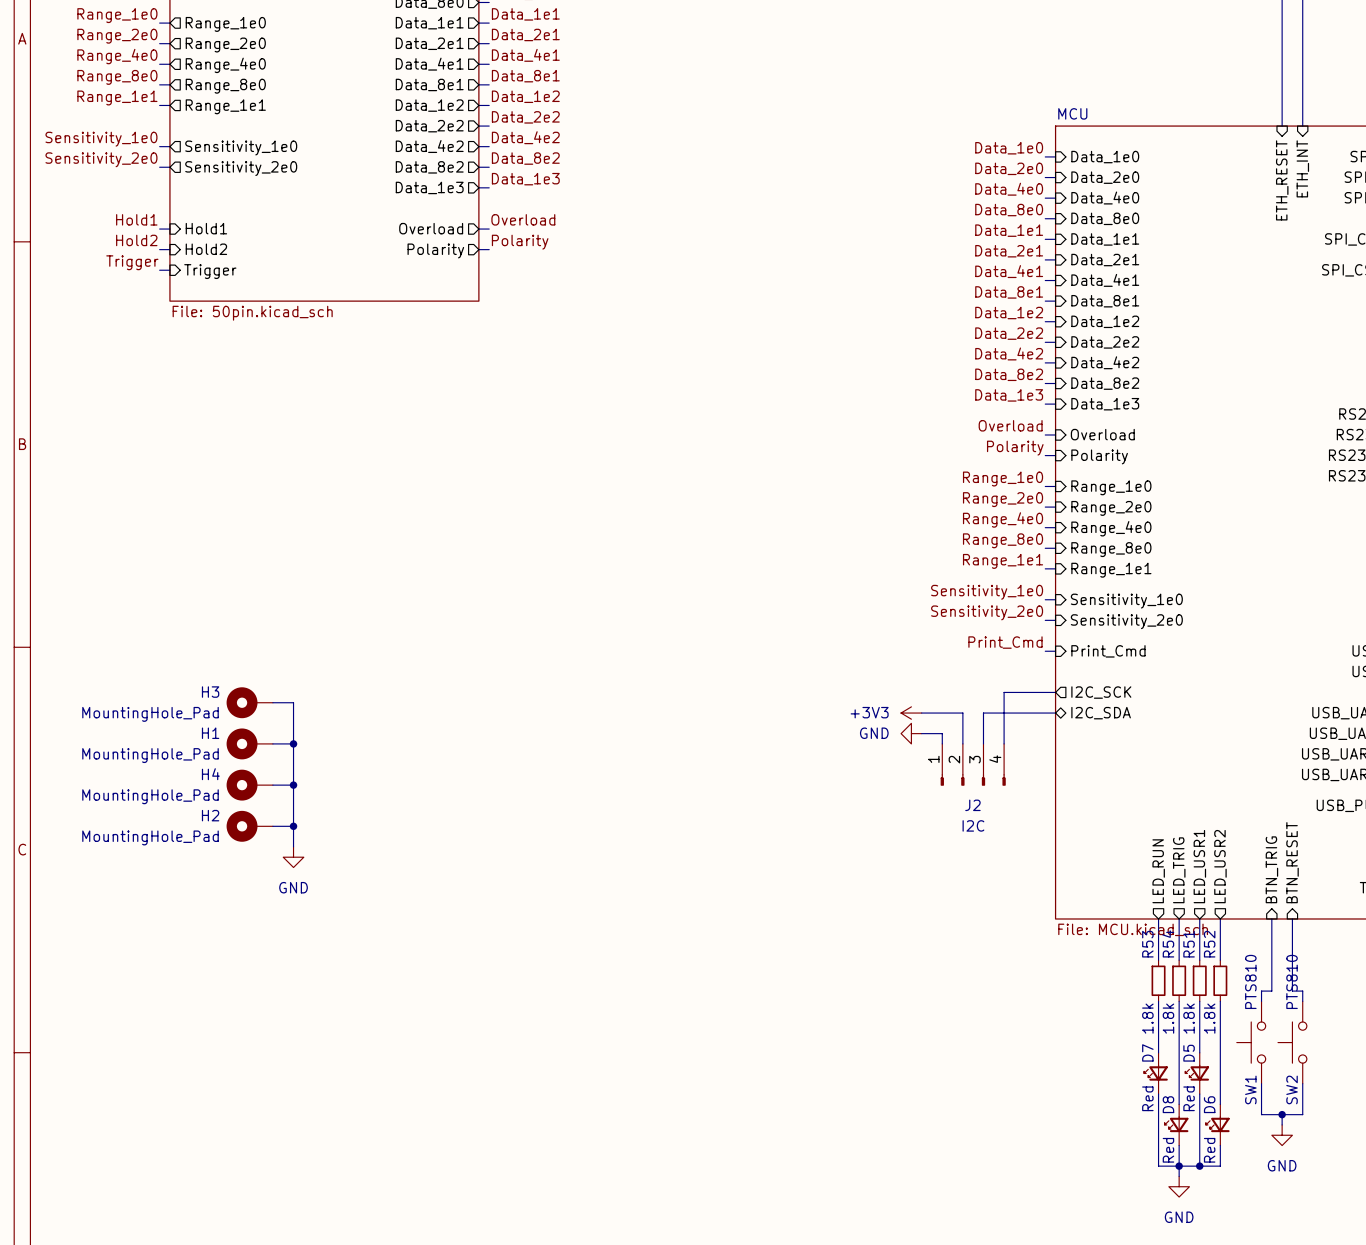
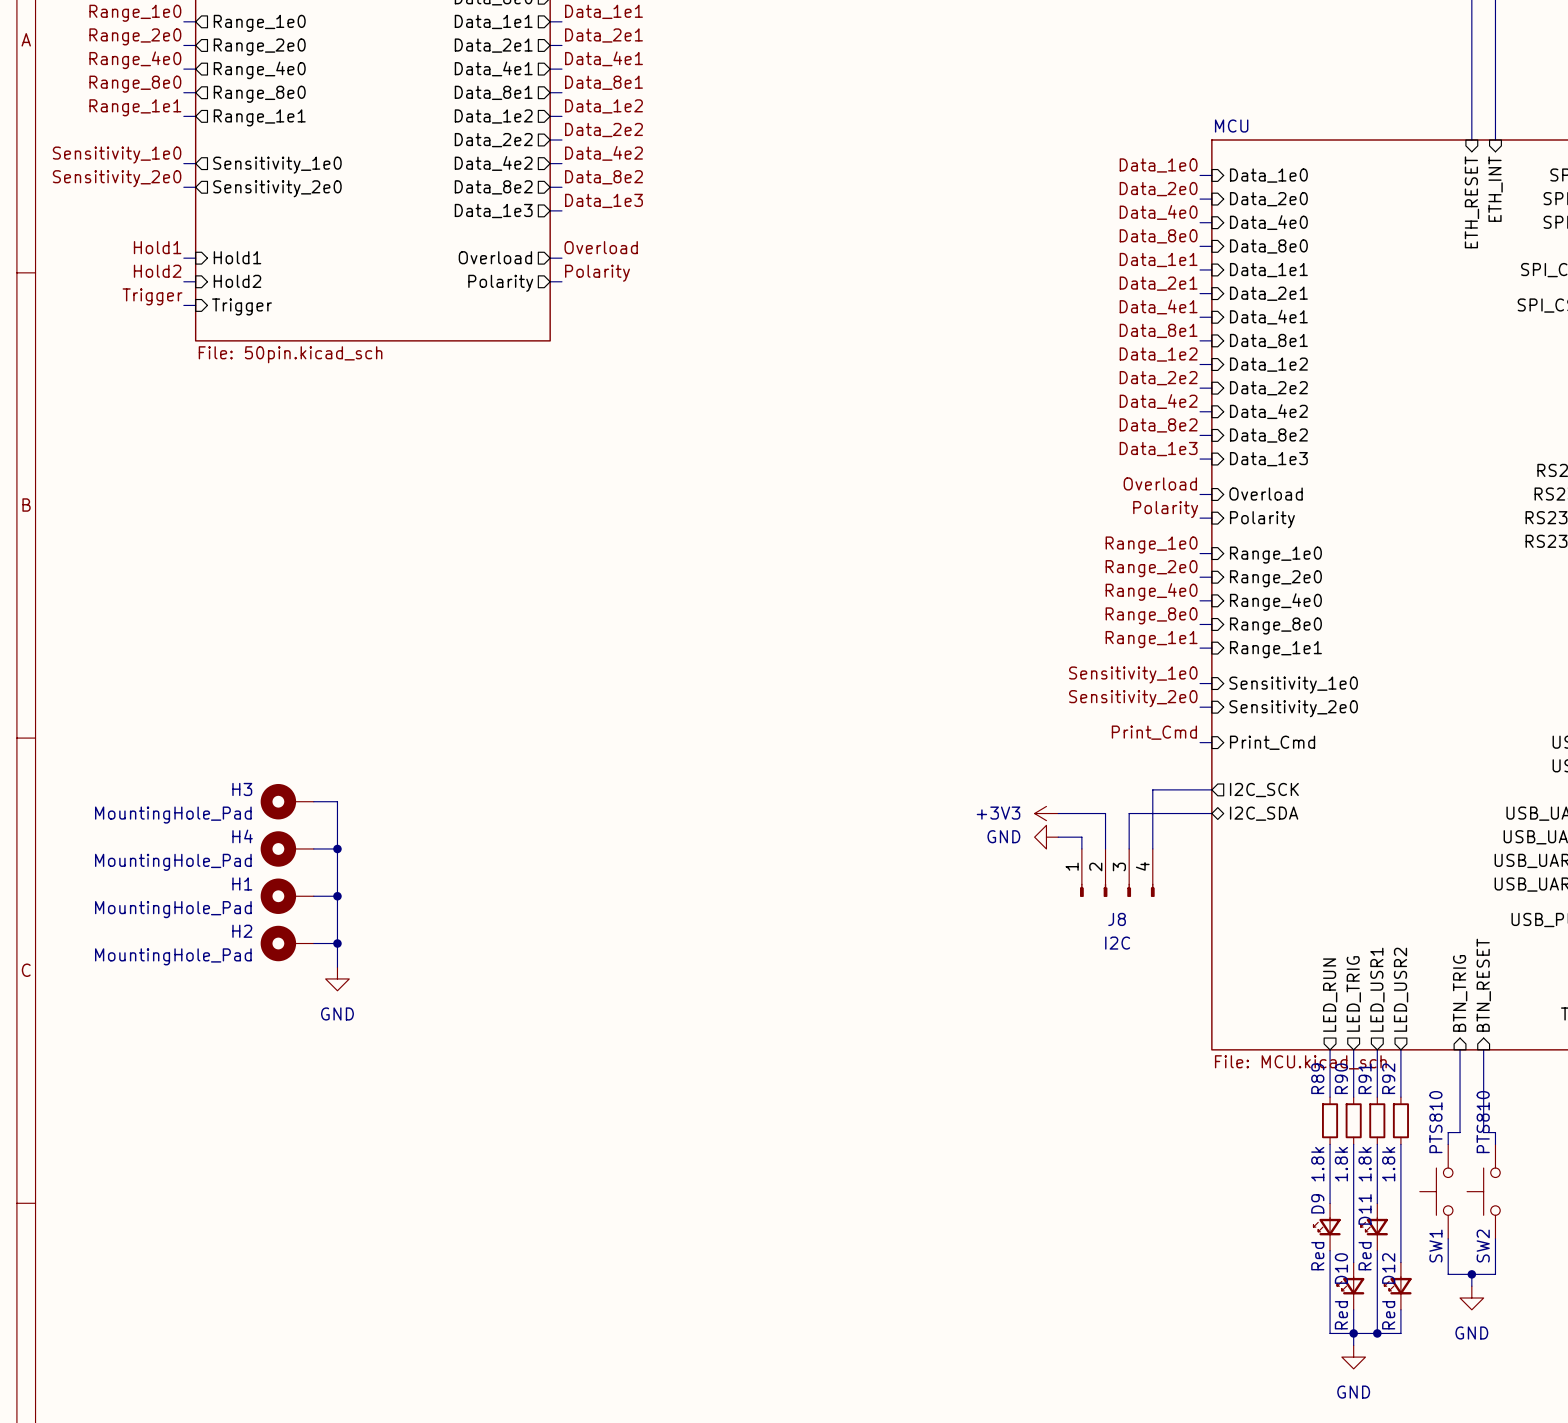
H1 name: H1 (210, 733) -> H4 (242, 836)
H4 name: H4 (210, 774) -> H1 (242, 883)
J2 name: J2 (972, 805) -> J8 (1117, 919)
R54 name: R54 (1168, 943) -> R90 (1341, 1078)
R53 name: R53 (1147, 944) -> R89 (1317, 1078)
R51 name: R51 (1189, 944) -> R91 (1365, 1078)
R52 name: R52 (1209, 944) -> R92 (1388, 1078)
D7 name: D7 (1147, 1052) -> D9 (1317, 1203)
D5 name: D5 (1189, 1053) -> D11 (1365, 1209)
D8 name: D8 (1168, 1104) -> D10 (1341, 1268)
D6 name: D6 (1209, 1104) -> D12 (1388, 1268)

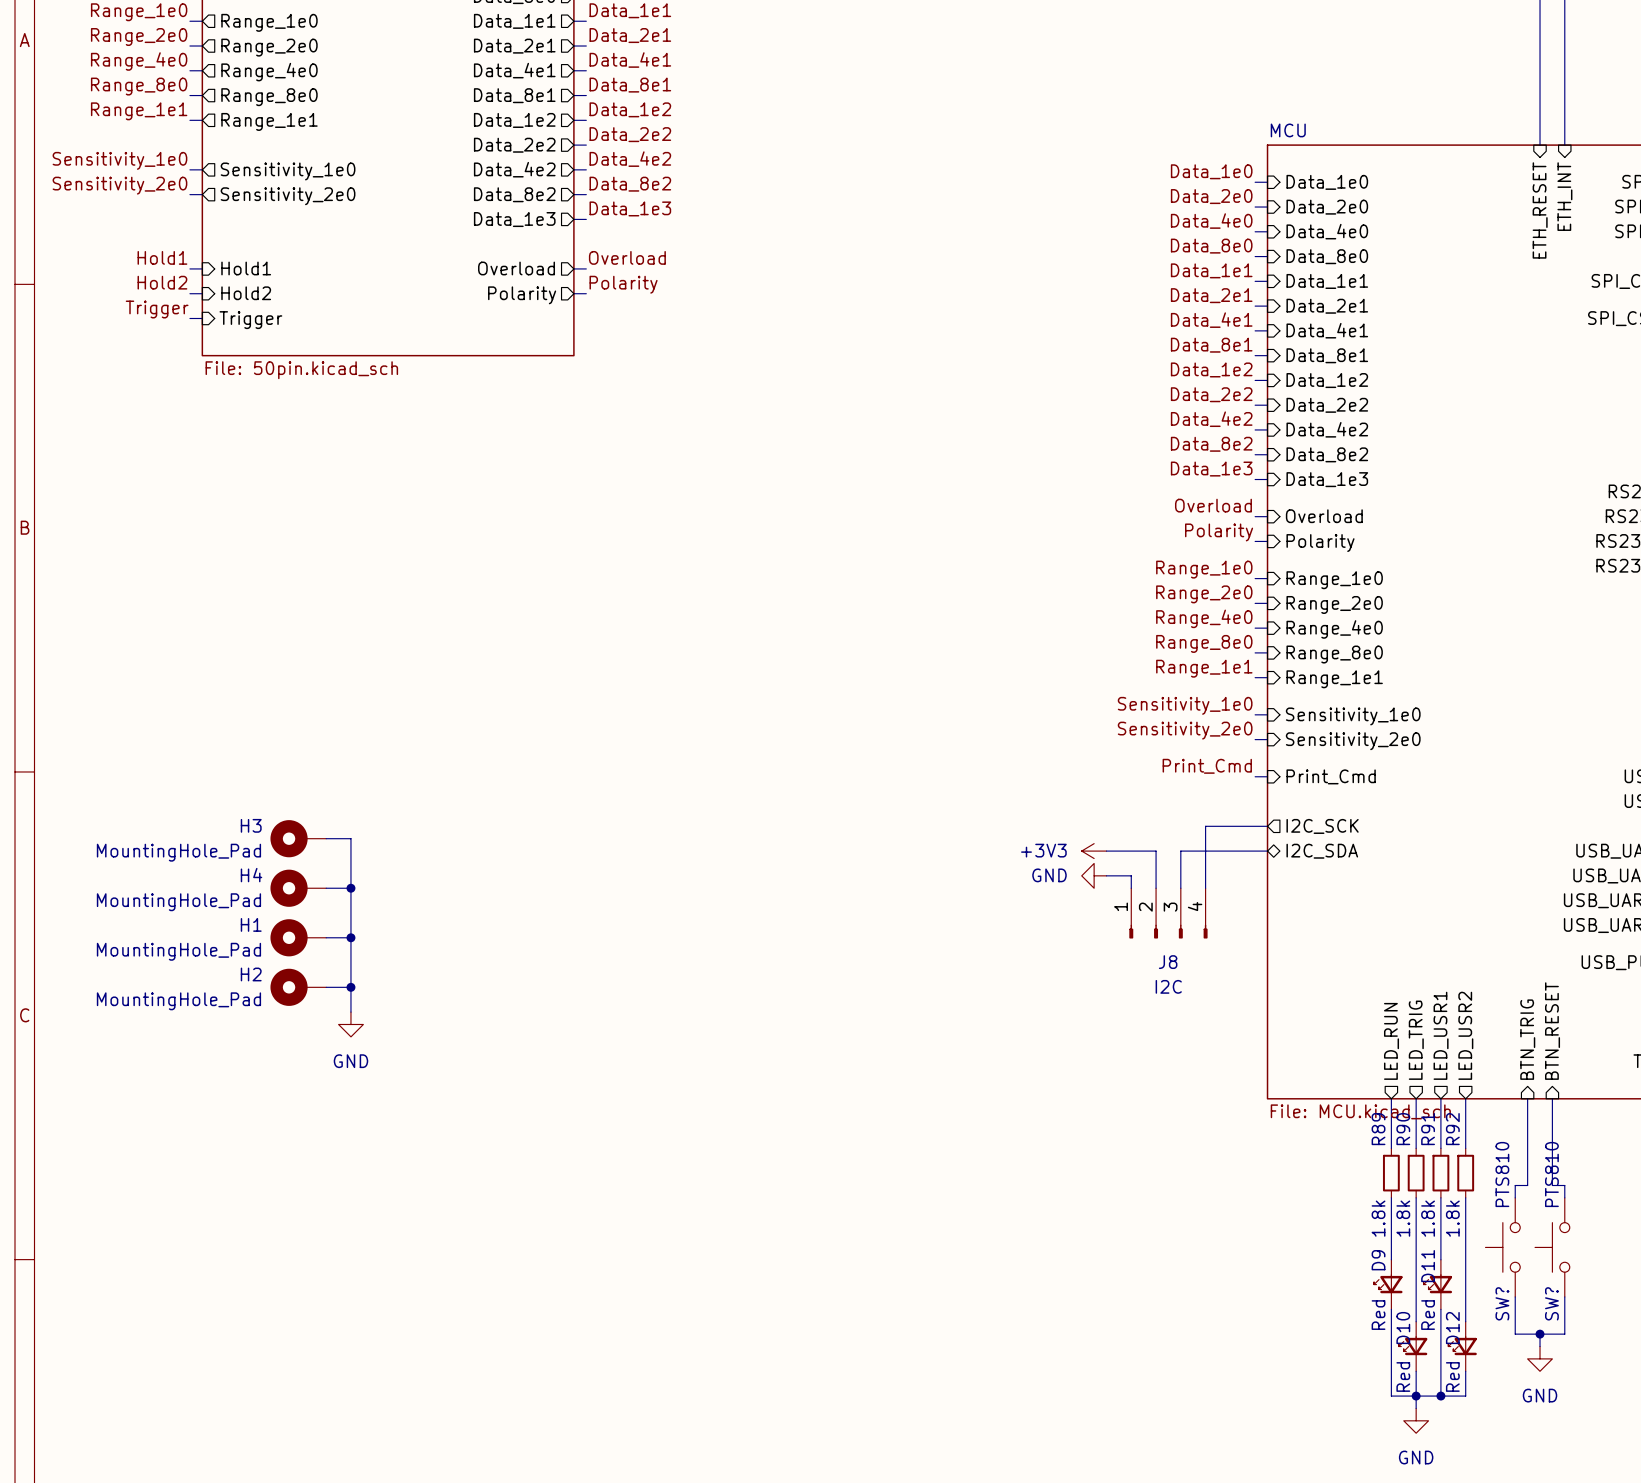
SW1 name: SW1 (1435, 1246) -> SW? (1502, 1303)
SW2 name: SW2 (1483, 1246) -> SW? (1551, 1303)

